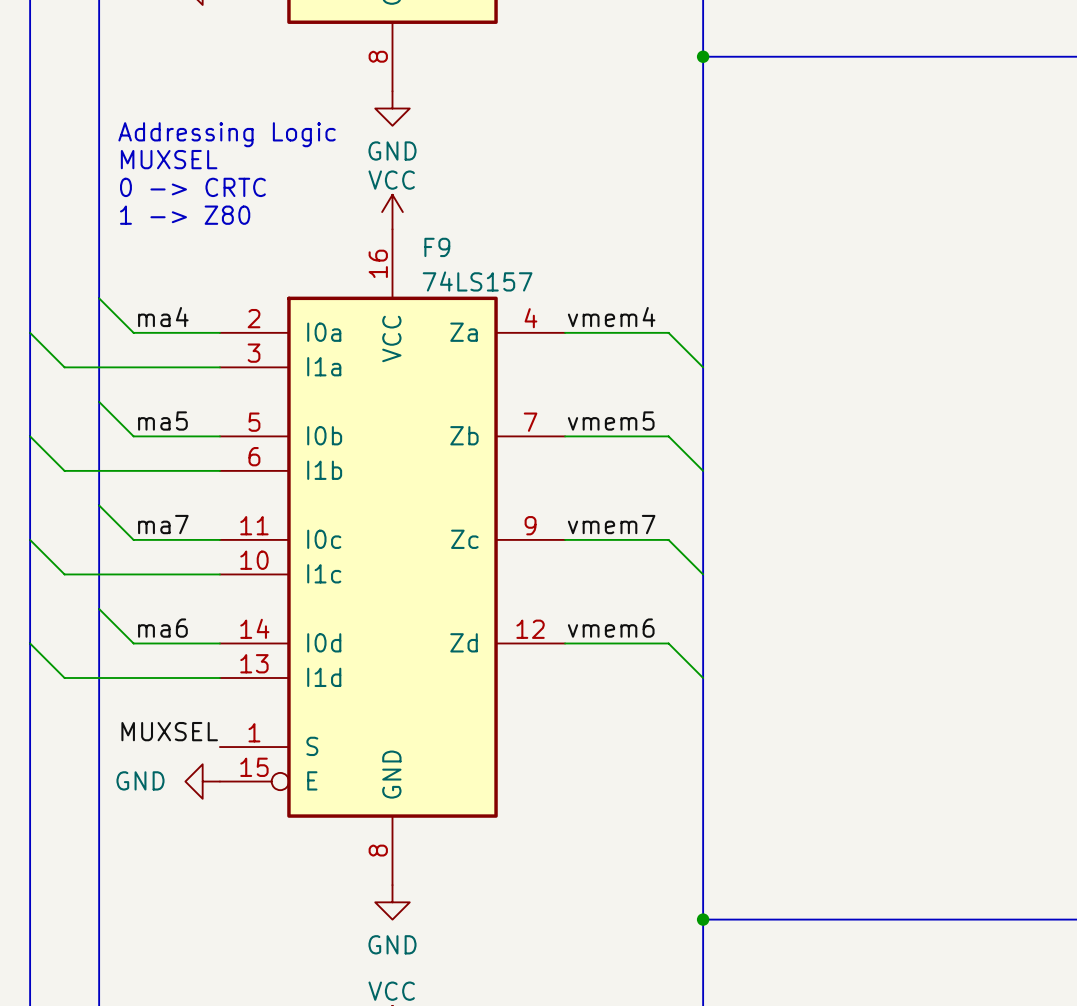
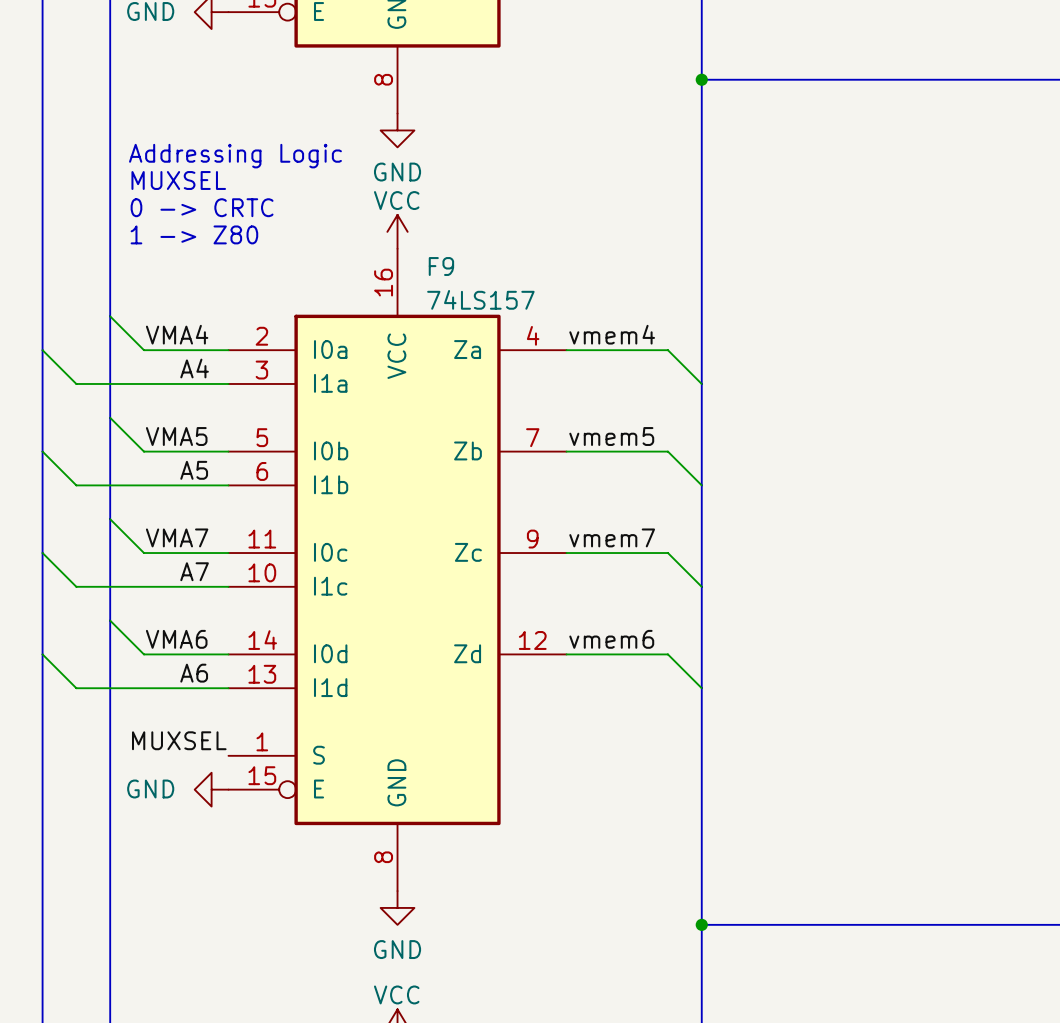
label: ma4 (163, 317) -> VMA4 (177, 334)
label: none -> A4 (194, 368)
label: ma5 (162, 421) -> VMA5 (176, 436)
label: none -> A5 (194, 470)
label: ma7 (163, 524) -> VMA7 (177, 537)
label: none -> A7 (194, 571)
label: ma6 (162, 628) -> VMA6 (176, 639)
label: none -> A6 (194, 673)

